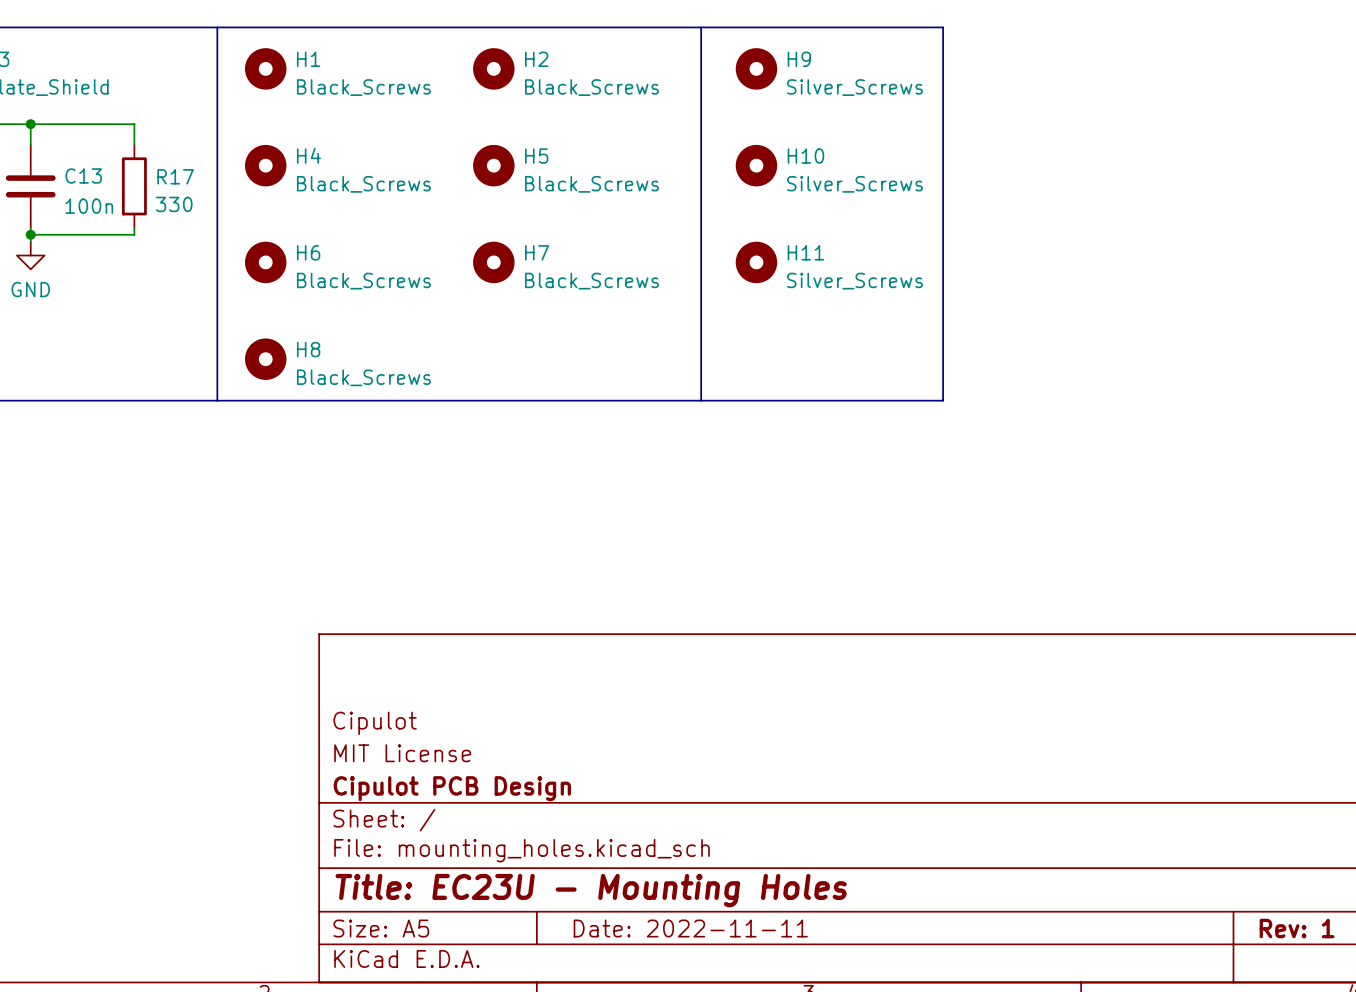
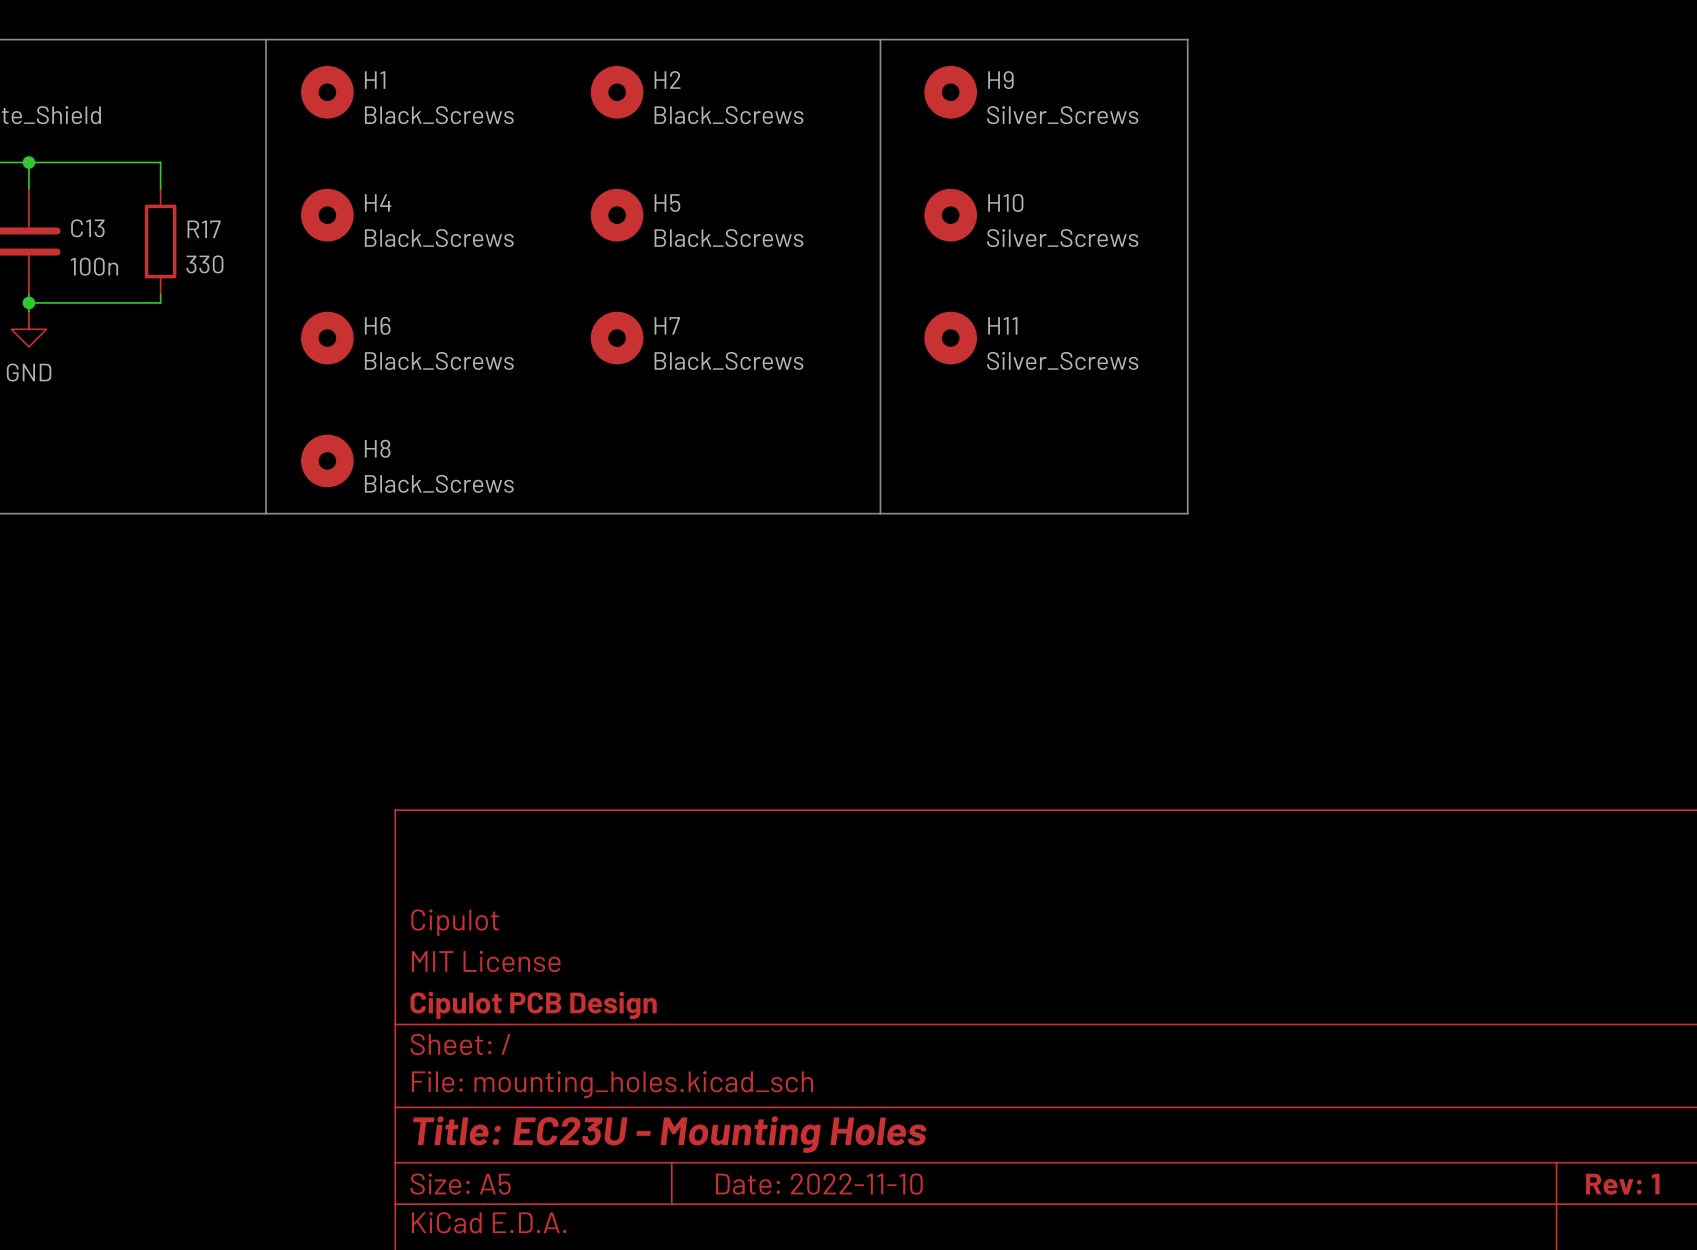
title block: Date: 2022-11-11 (690, 928) -> Date: 2022-11-10 (819, 1184)

